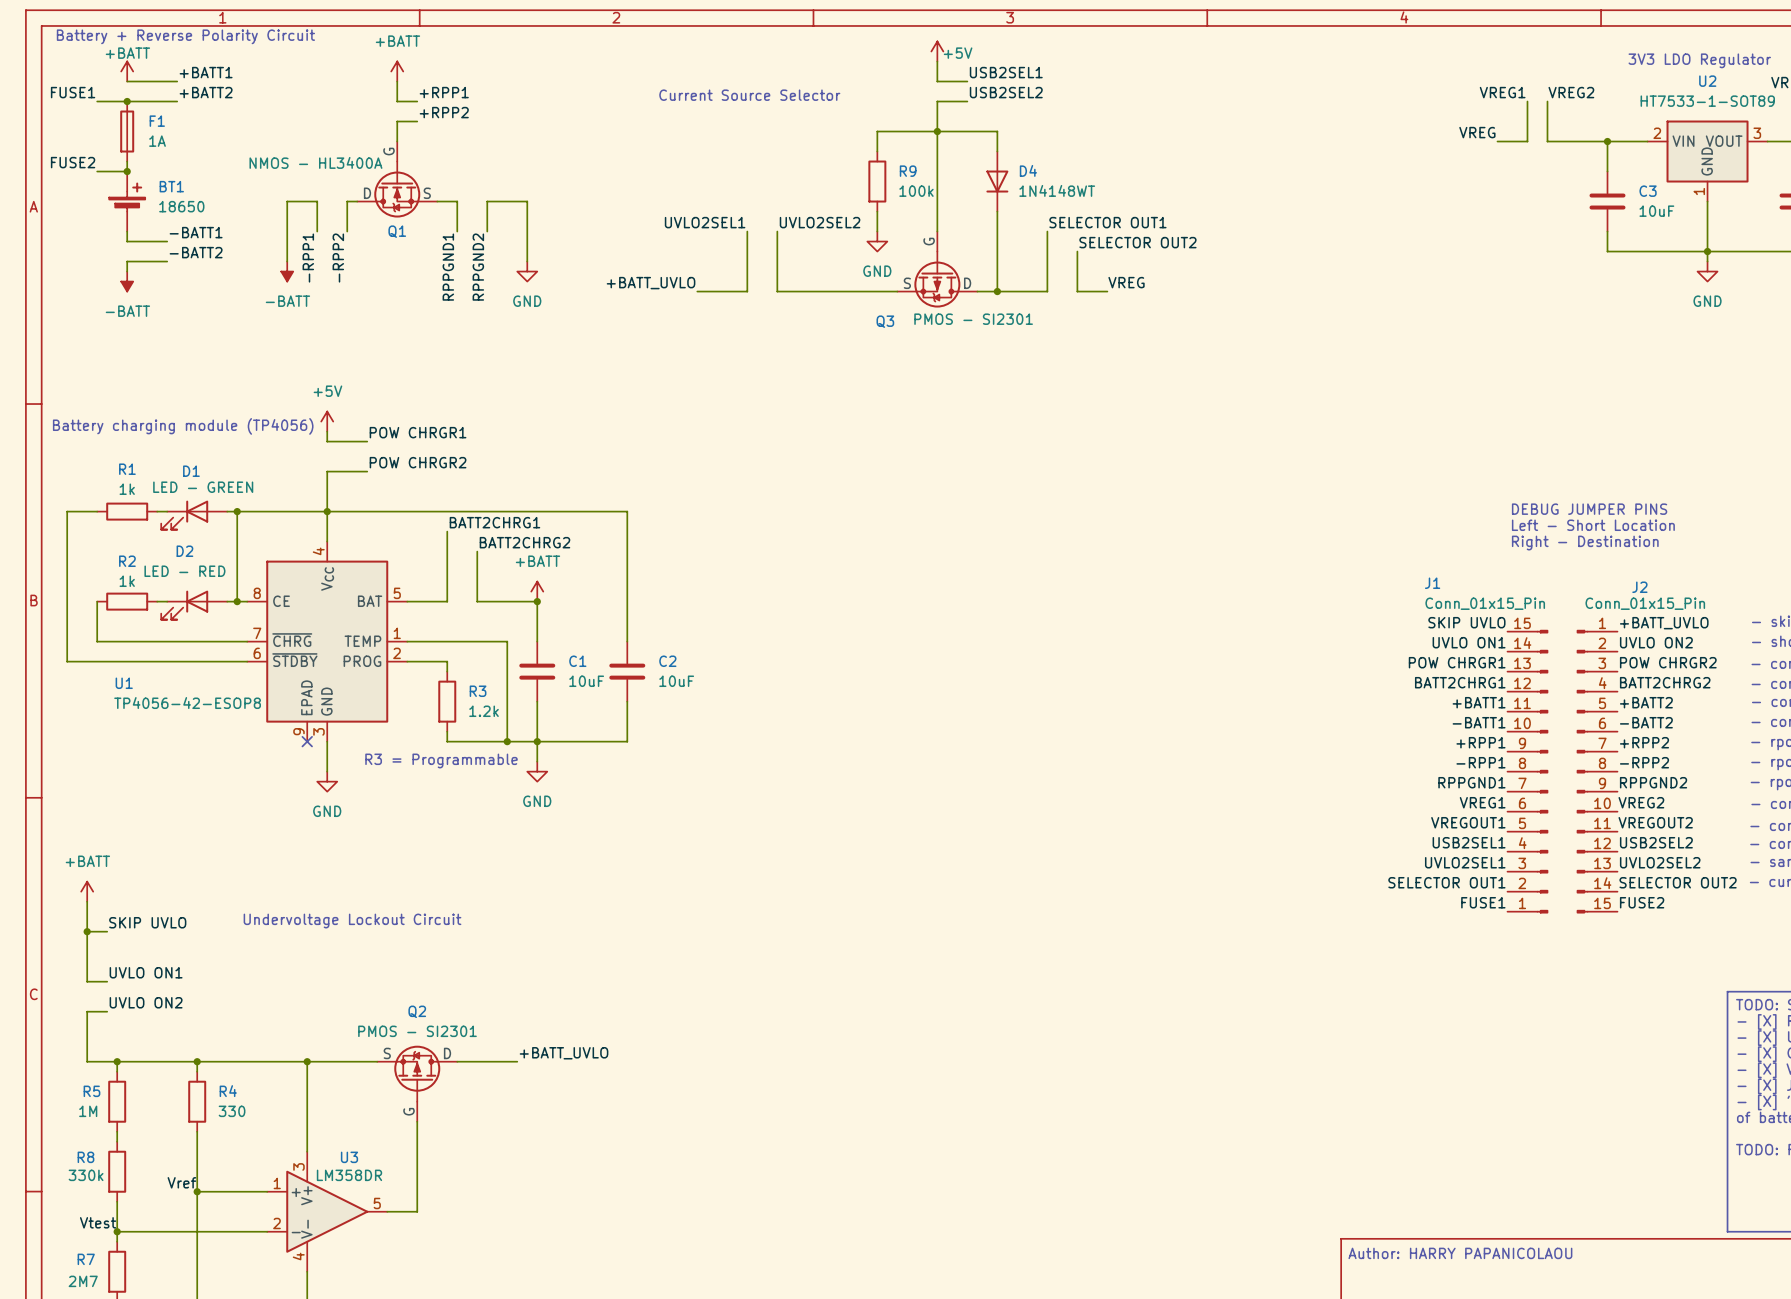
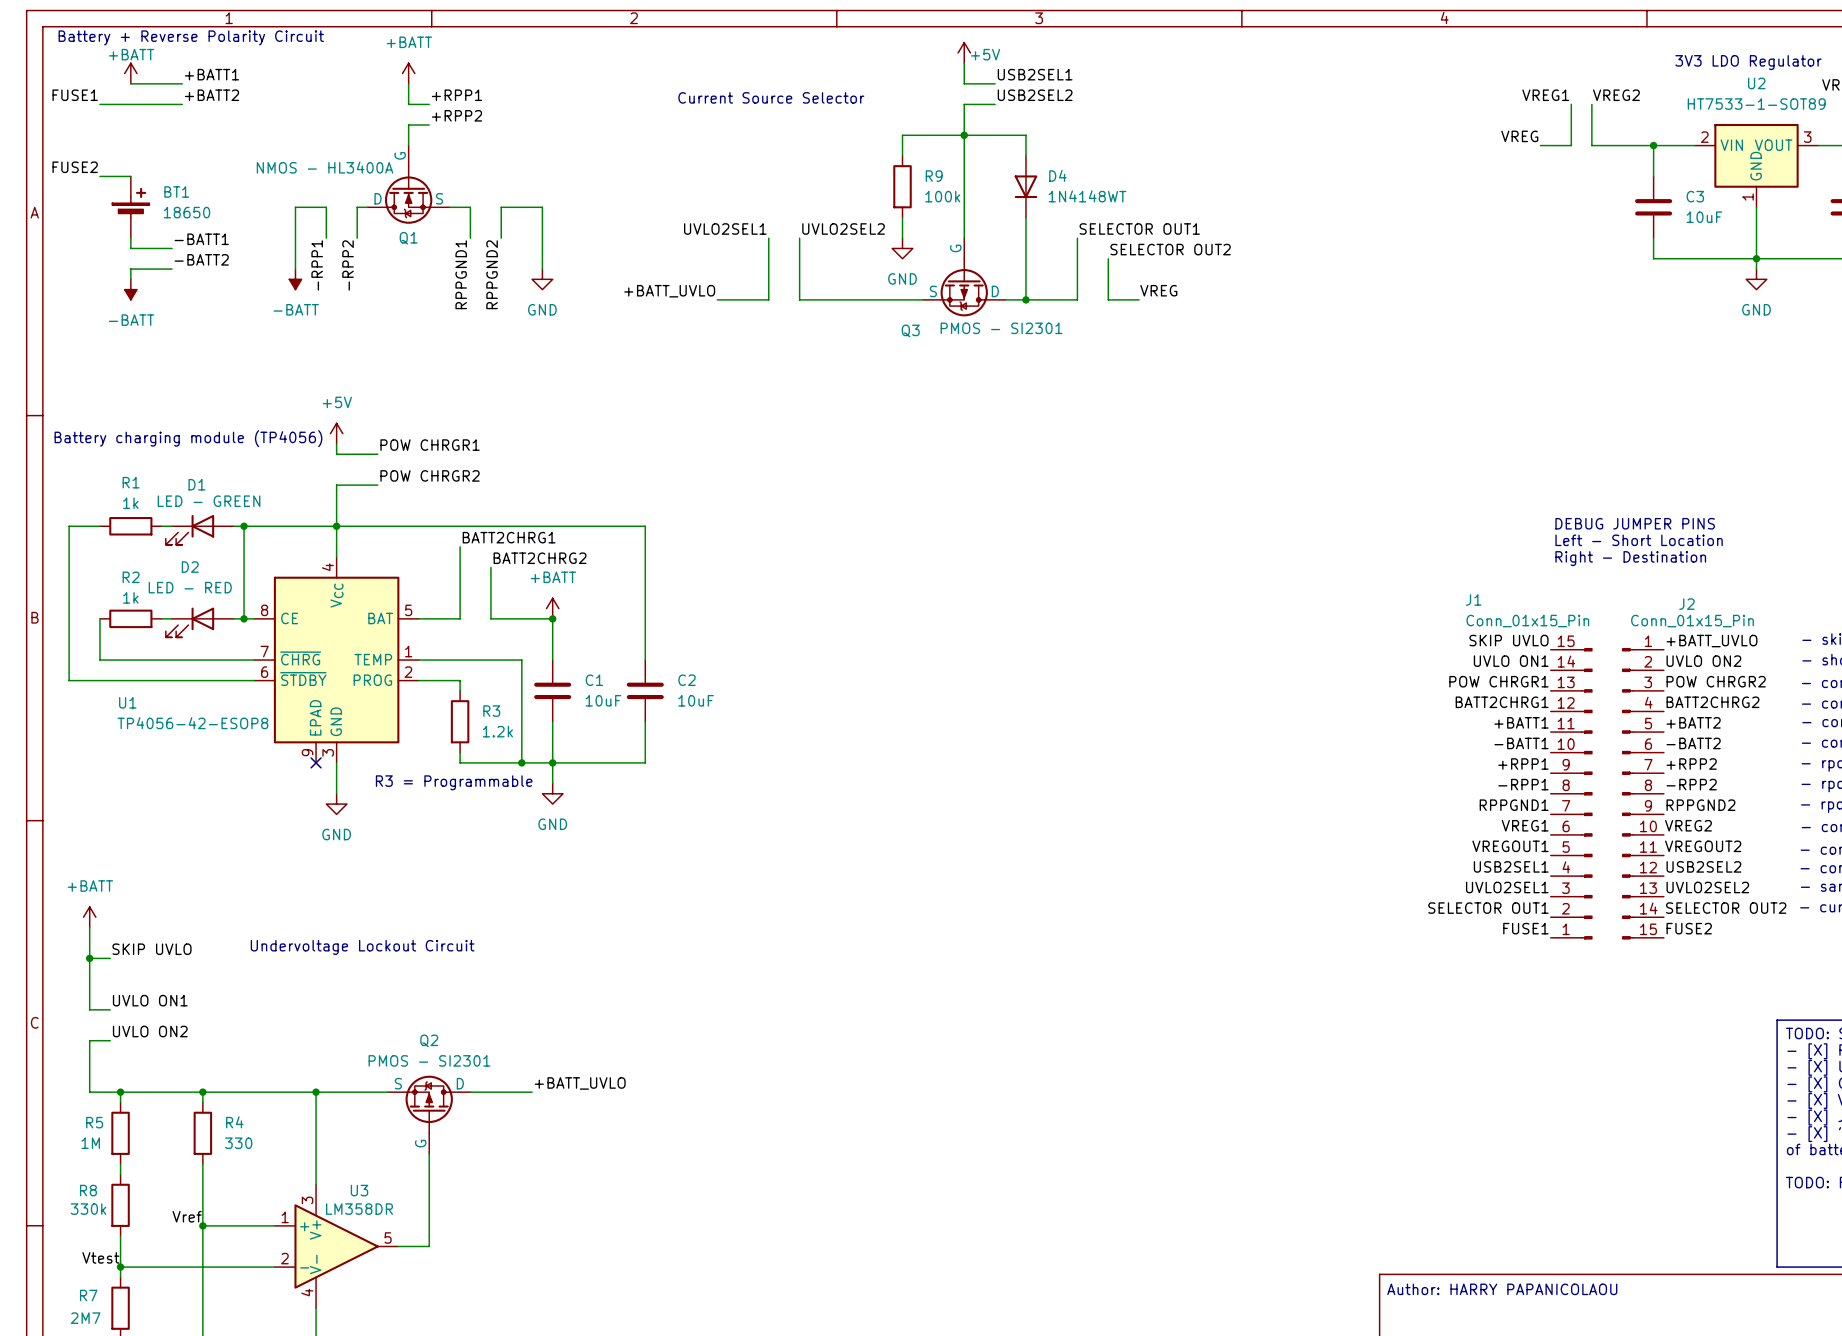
junction: (127, 101) -> none
F1: 1A (127, 131) -> none
wire: (127, 161) (127, 171) -> none
junction: (127, 171) -> none

